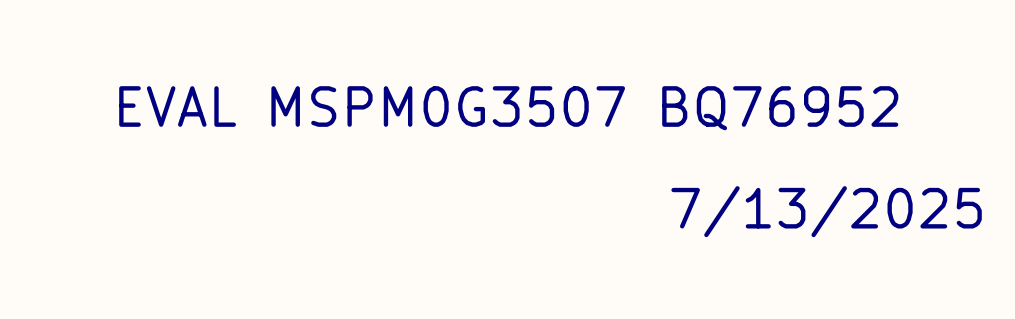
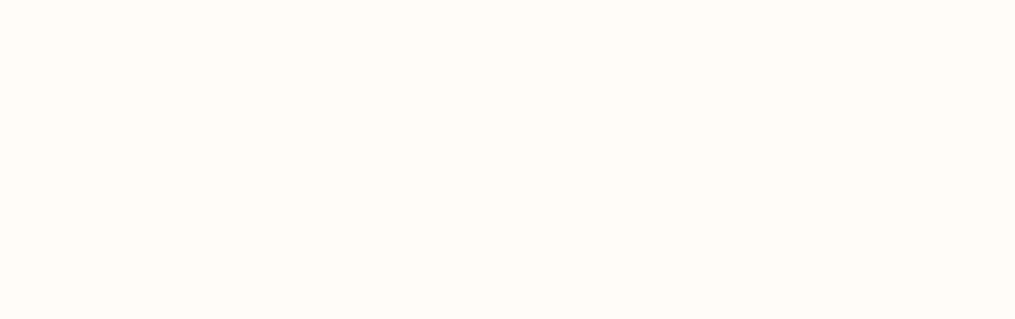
text: EVAL MSPM0G3507 BQ76952 (508, 108) -> none
text: 7/13/2025 (826, 211) -> none

